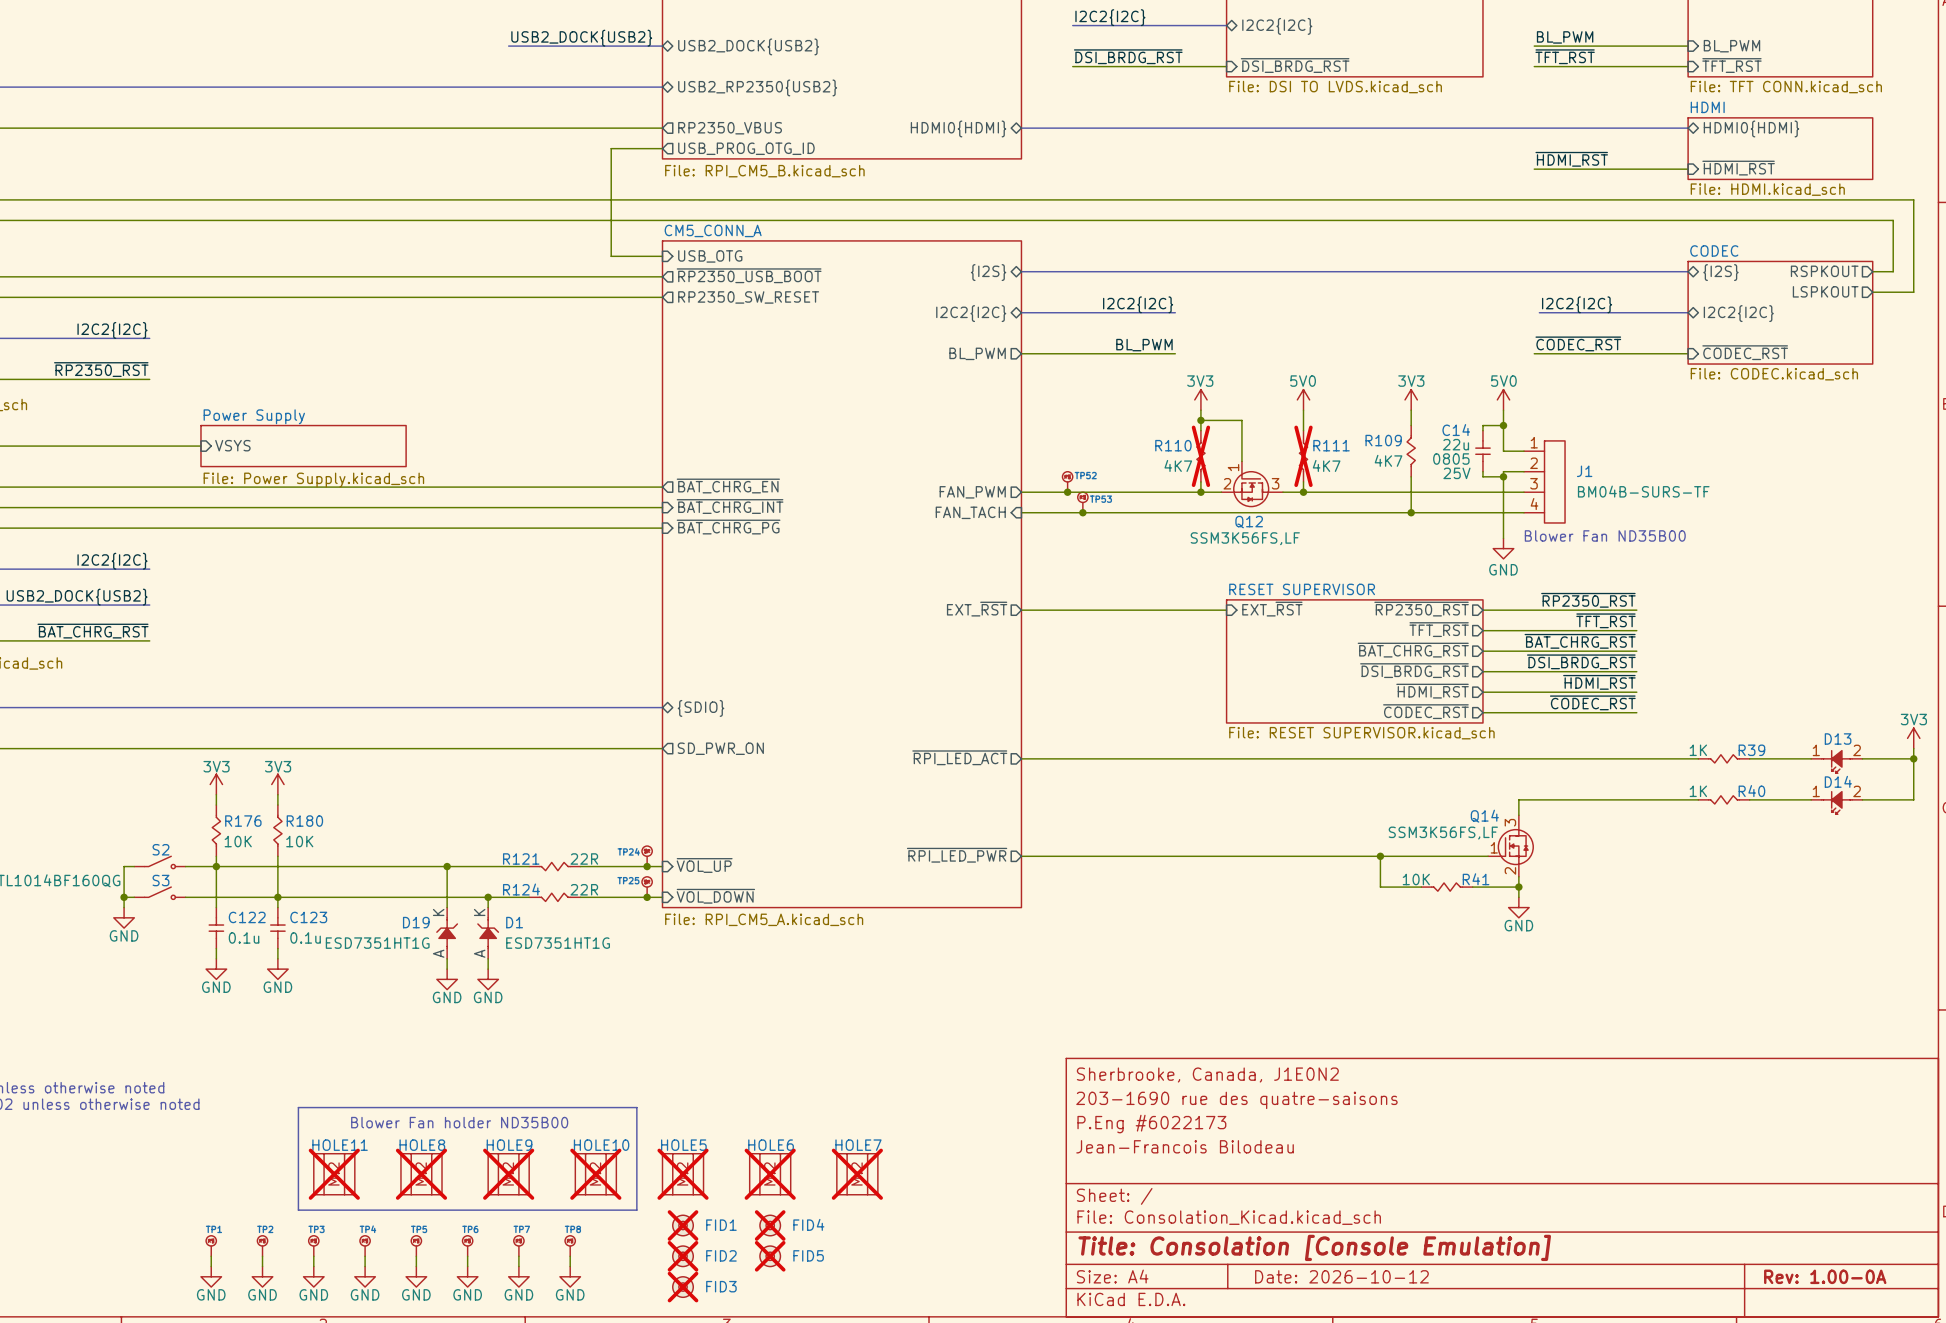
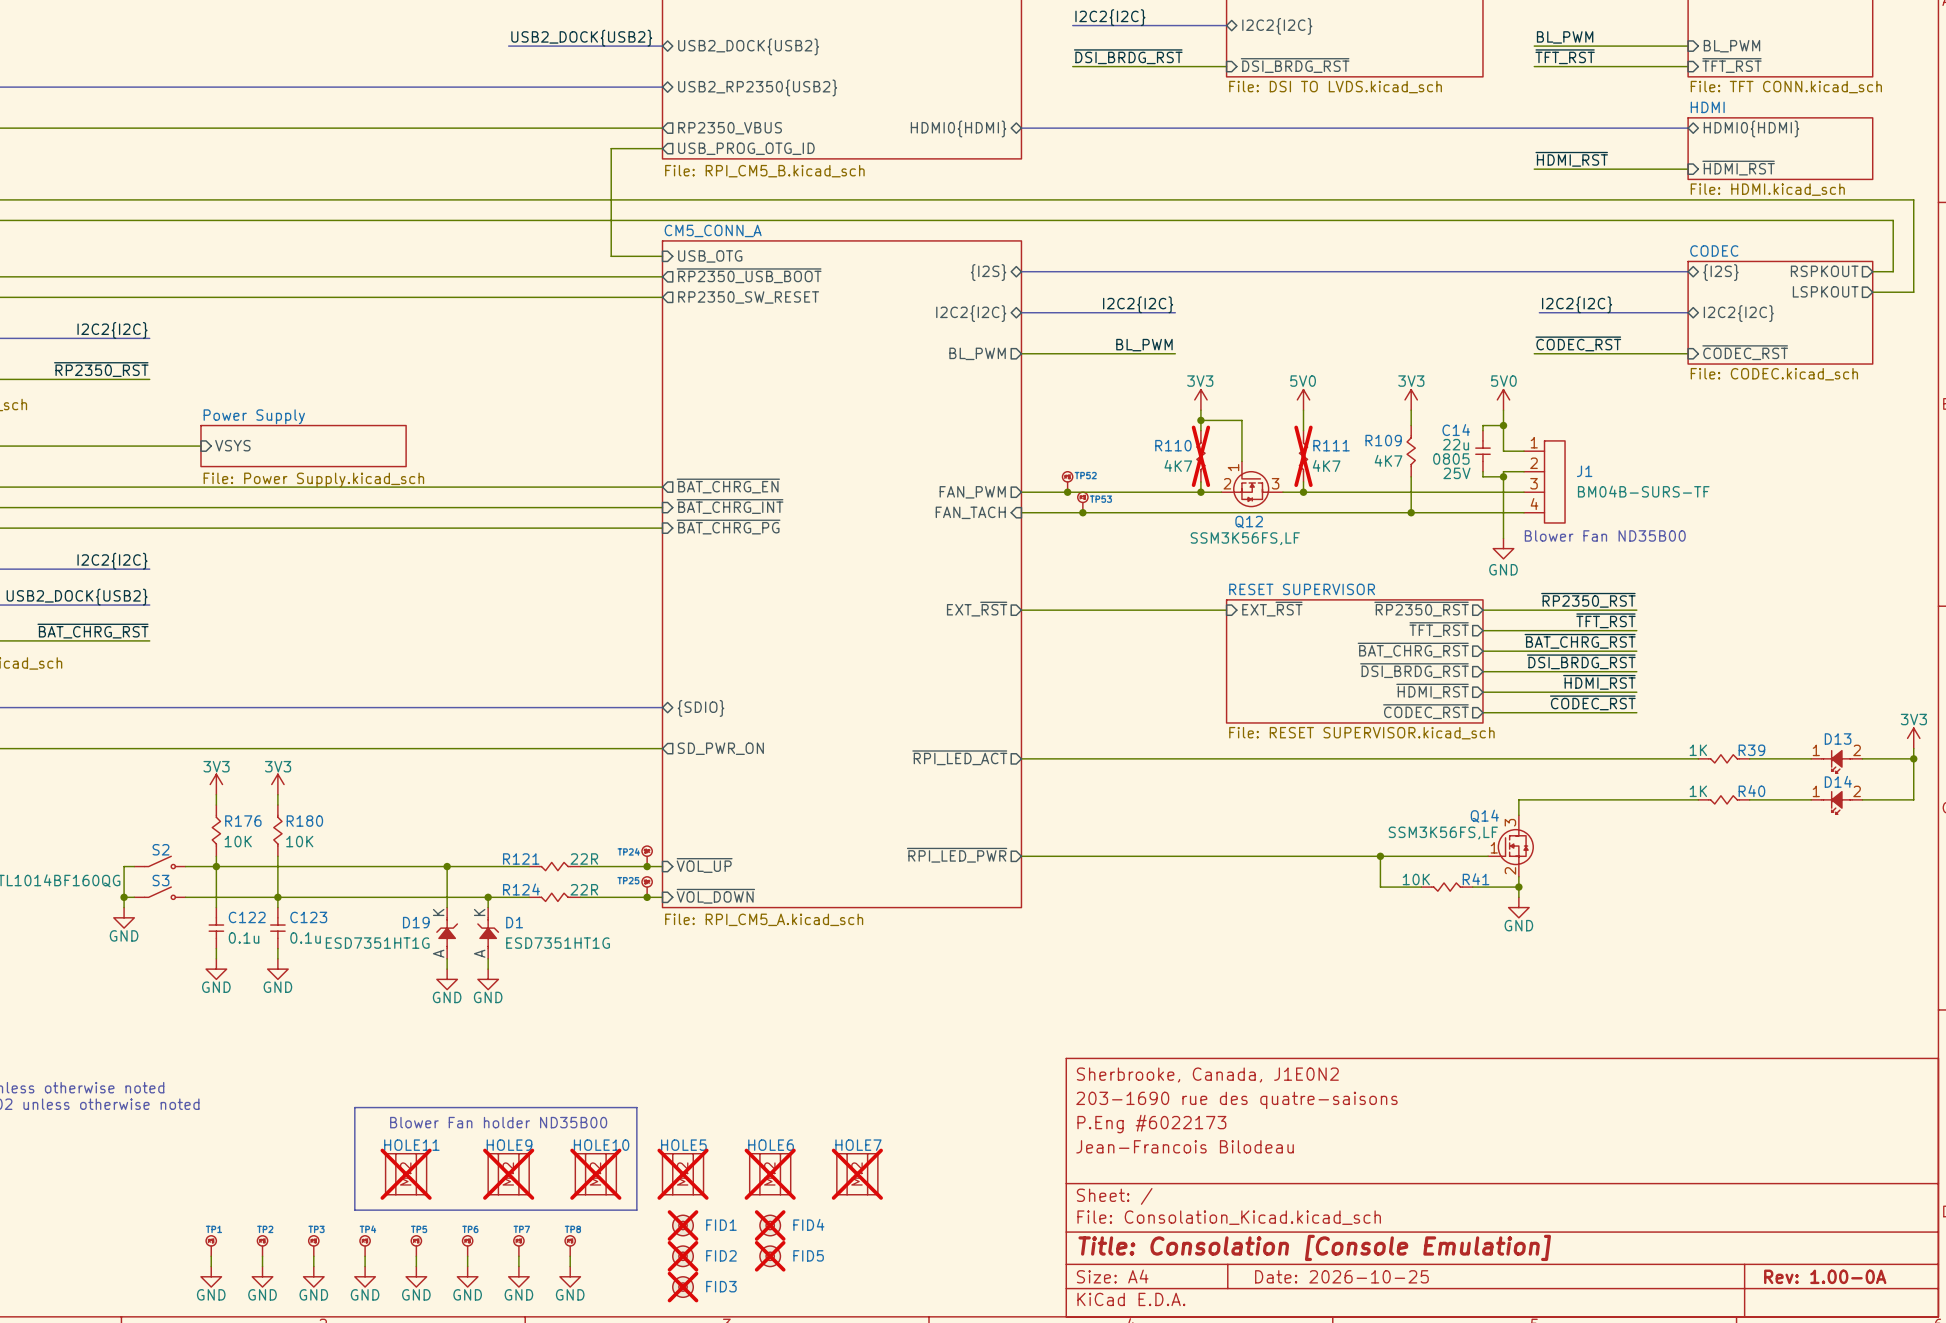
line: (354, 1107) (298, 1107) (298, 1210) (354, 1210) -> (354, 1107) (354, 1210)
text position: Blower Fan holder ND35B00 (459, 1122) -> Blower Fan holder ND35B00 (498, 1122)
HOLE11 position: (334, 1174) -> (406, 1174)
HOLE8: (421, 1174) -> none
title block: Date: 2026-10-12 (1341, 1276) -> Date: 2026-10-25 (1341, 1276)

